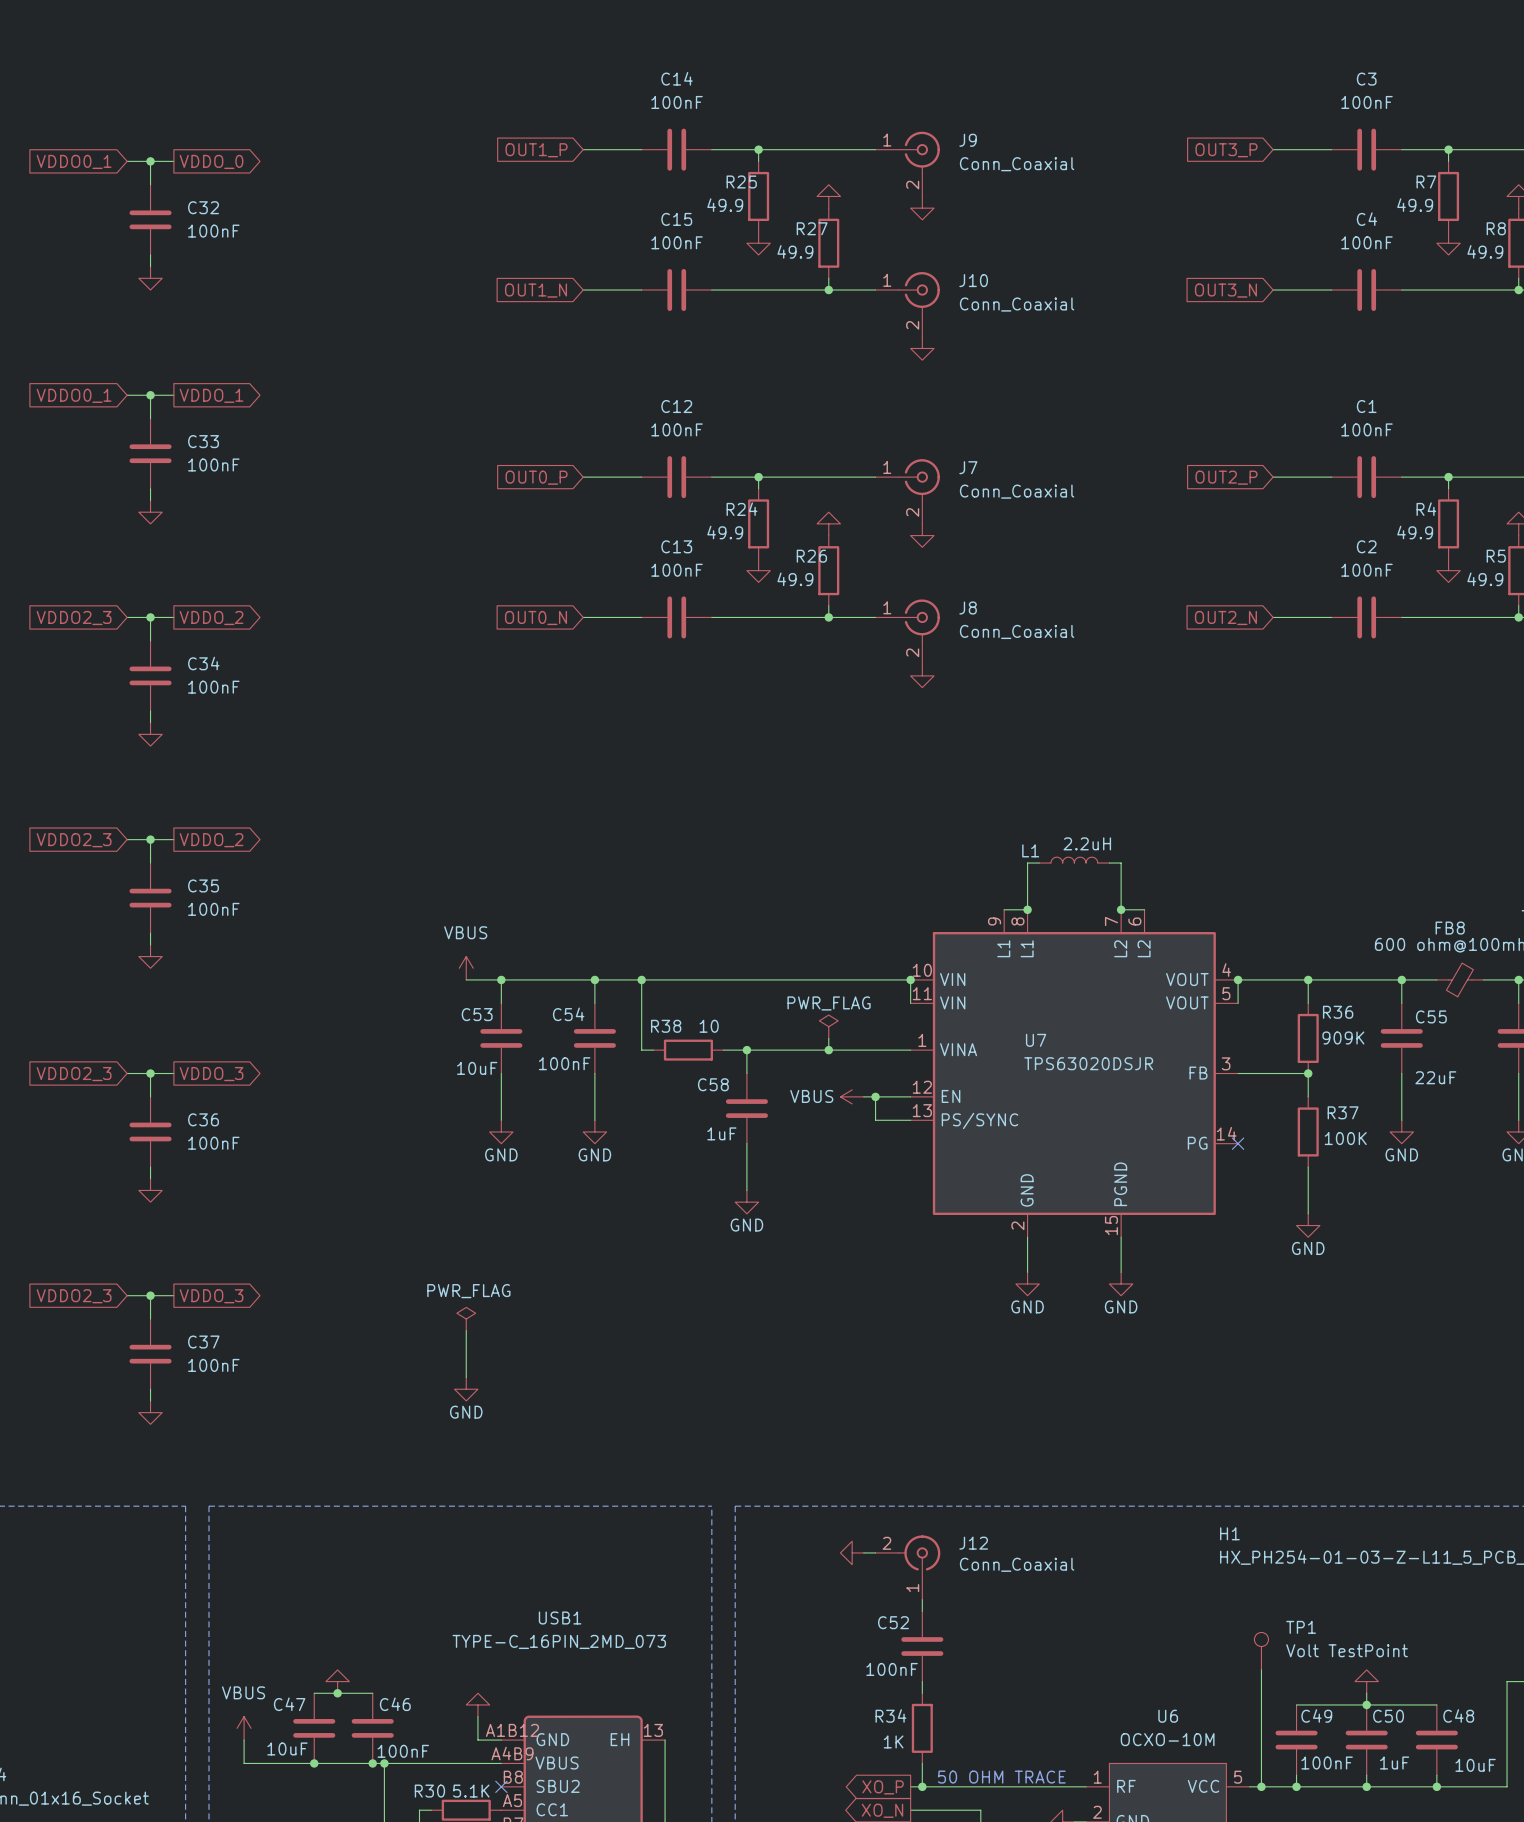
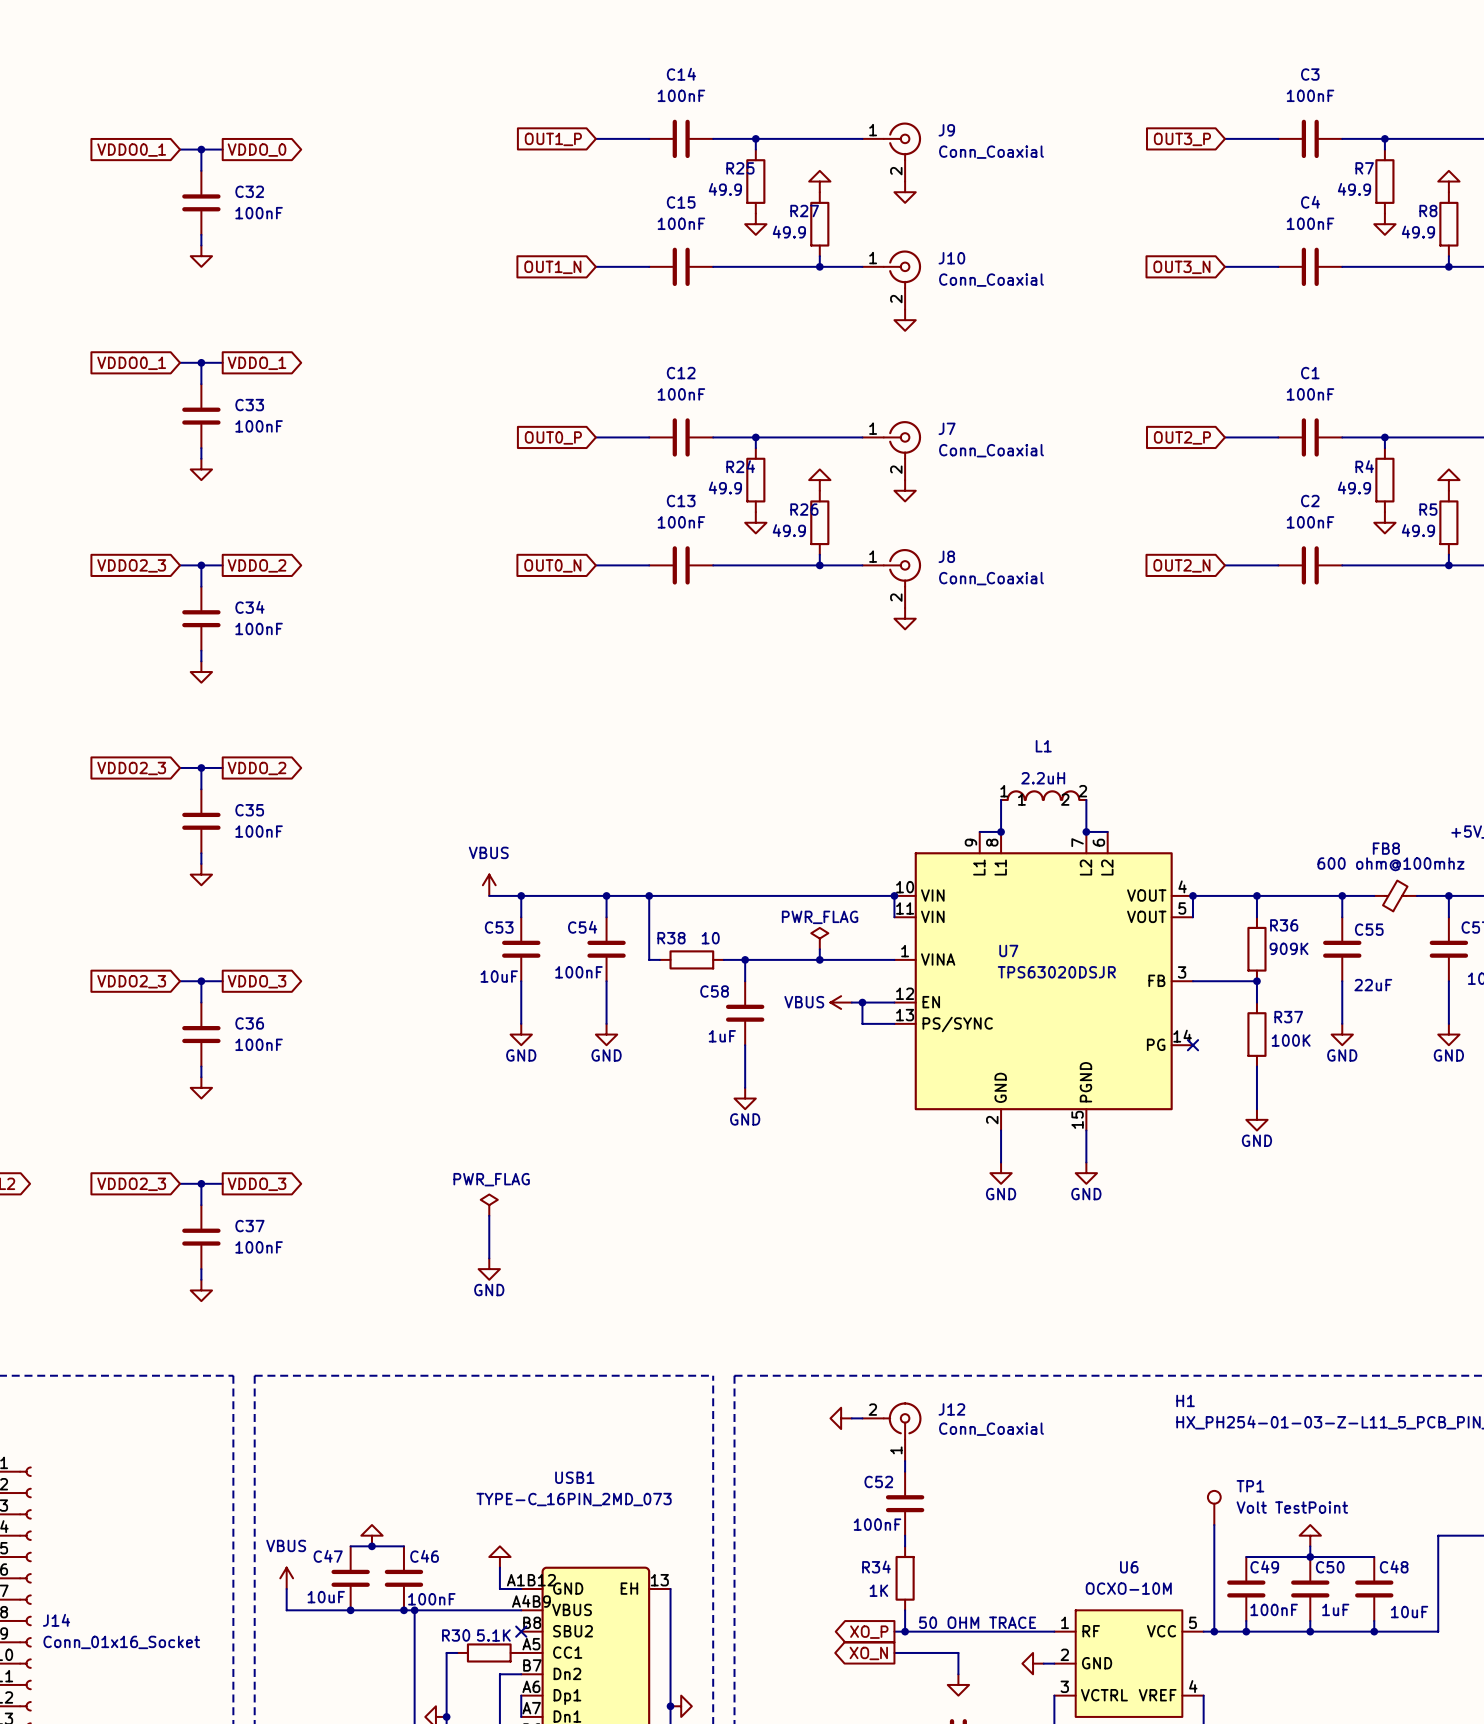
L1 name position: L1 (1030, 850) -> L1 (1043, 746)
L1 symbol: [1039, 857, 1110, 864] -> [1001, 790, 1087, 801]
wire: (1039, 863) (1027, 863) (1027, 874) -> none
wire: (1109, 863) (1121, 863) (1121, 874) -> none

